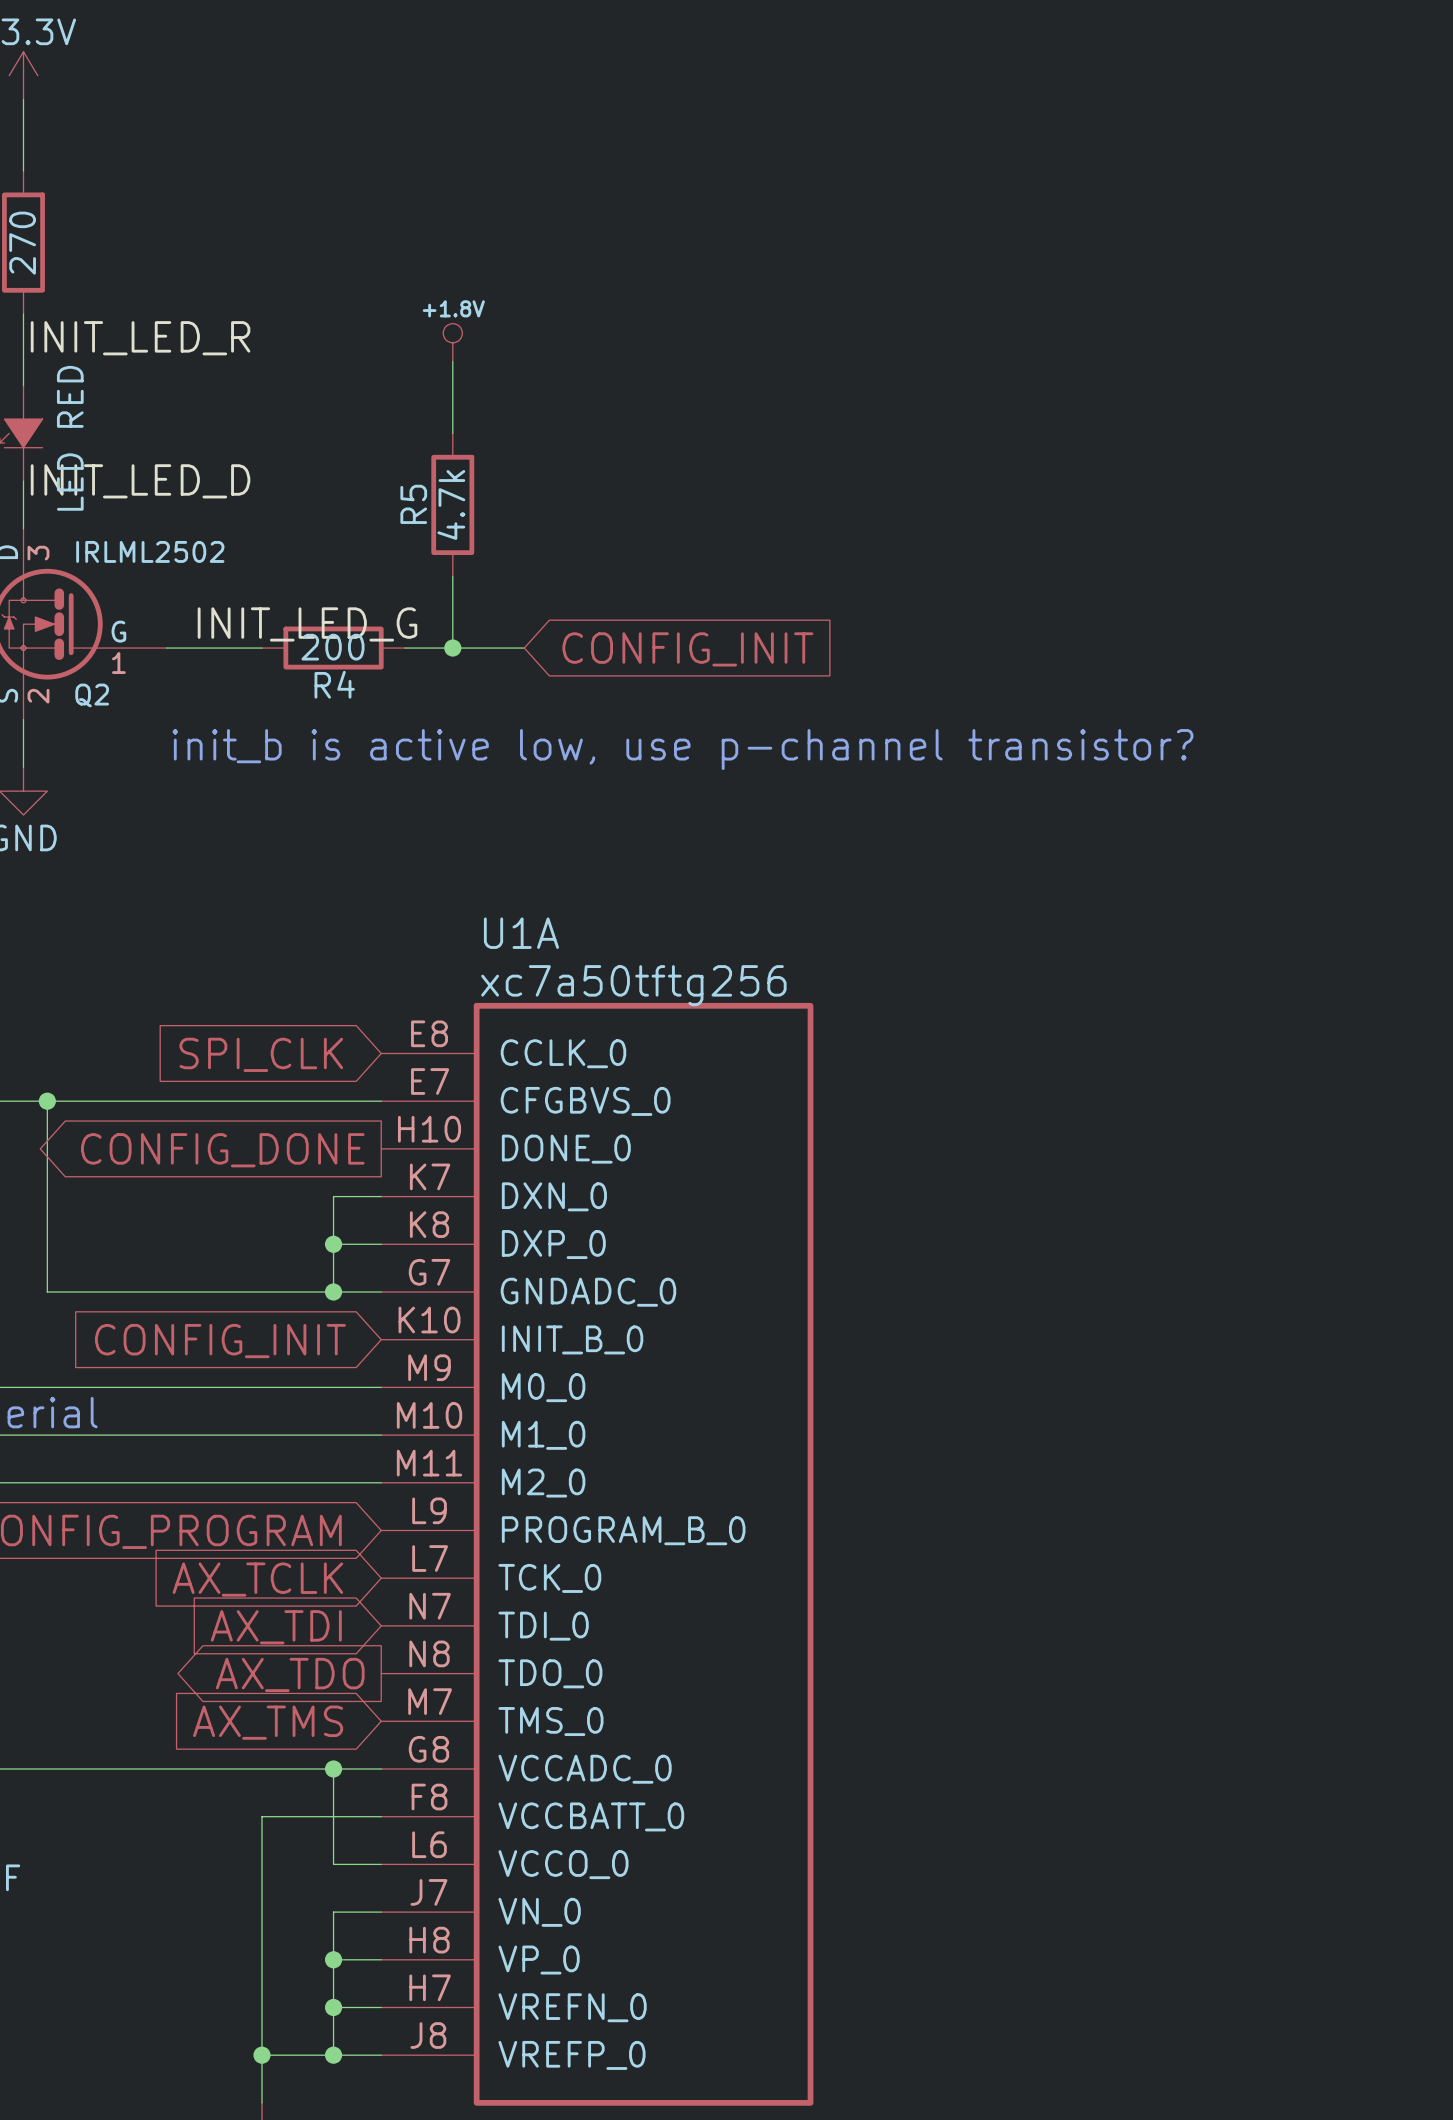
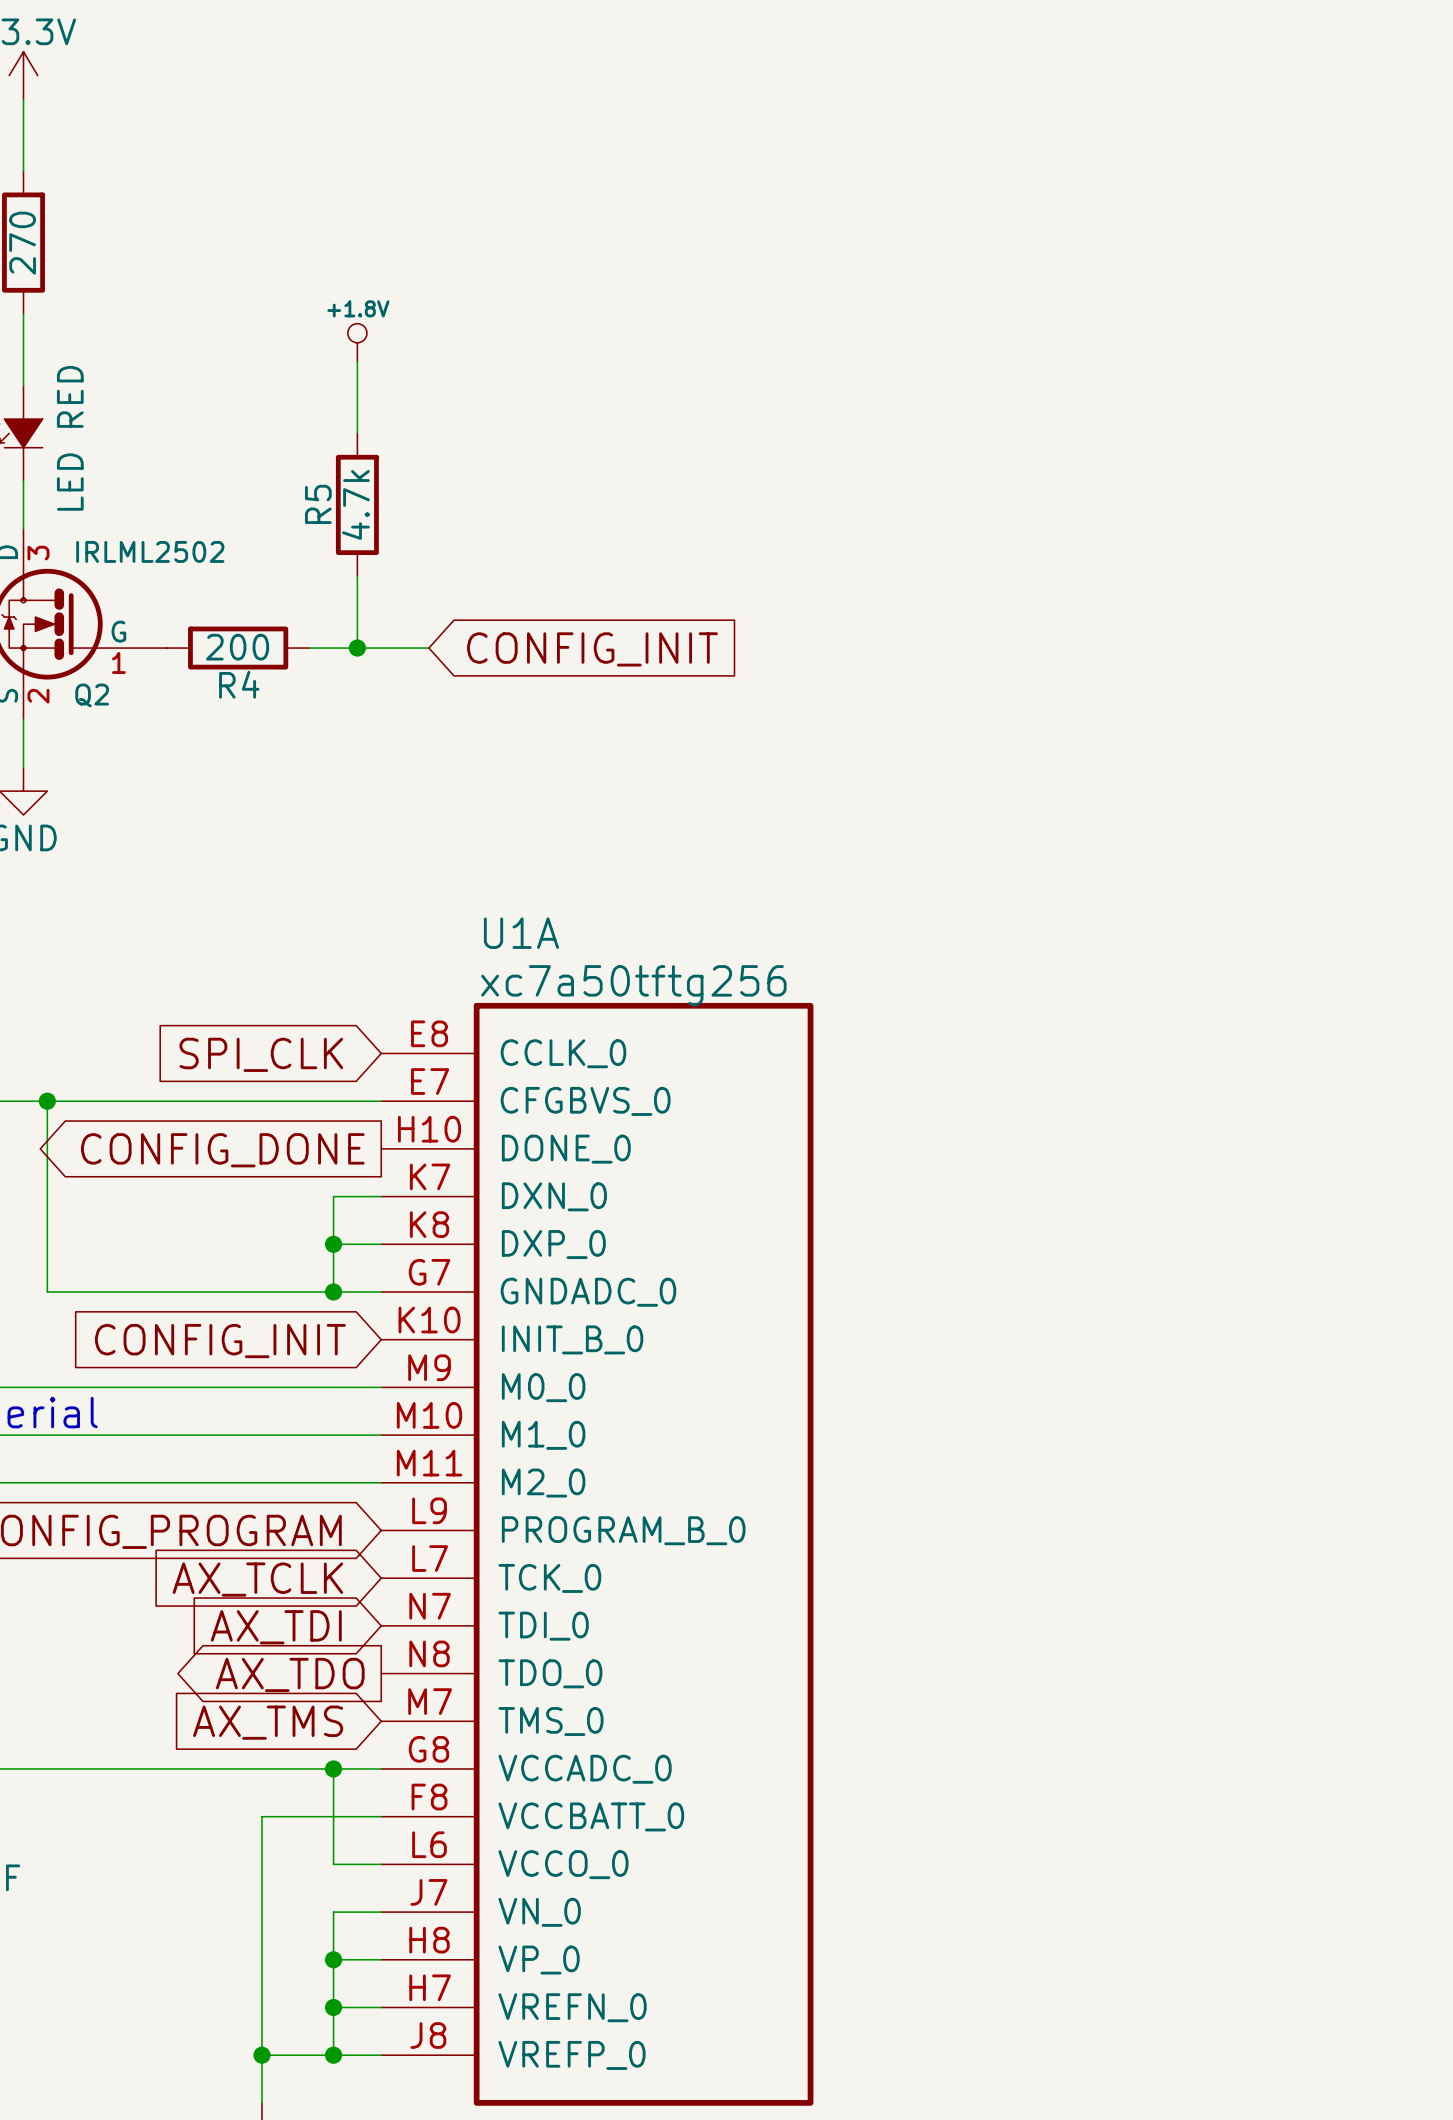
label: INIT_LED_R (140, 338) -> none
power symbol position: +1.8V (452, 342) -> +1.8V (357, 342)
wire: (452, 361) (452, 433) -> (357, 361) (357, 433)
label: INIT_LED_D (140, 481) -> none
R5 position: (452, 504) -> (357, 504)
wire: (452, 576) (452, 648) -> (357, 576) (357, 648)
label: INIT_LED_G (307, 624) -> none
wire: (166, 648) (261, 648) -> none
R4 position: (333, 648) -> (238, 648)
wire: (428, 648) (524, 648) -> (309, 648) (405, 648)
junction position: (452, 648) -> (357, 648)
global label position: CONFIG_INIT (687, 649) -> CONFIG_INIT (592, 649)
text: init_b is active low, use p-channel transistor? (682, 749) -> none

